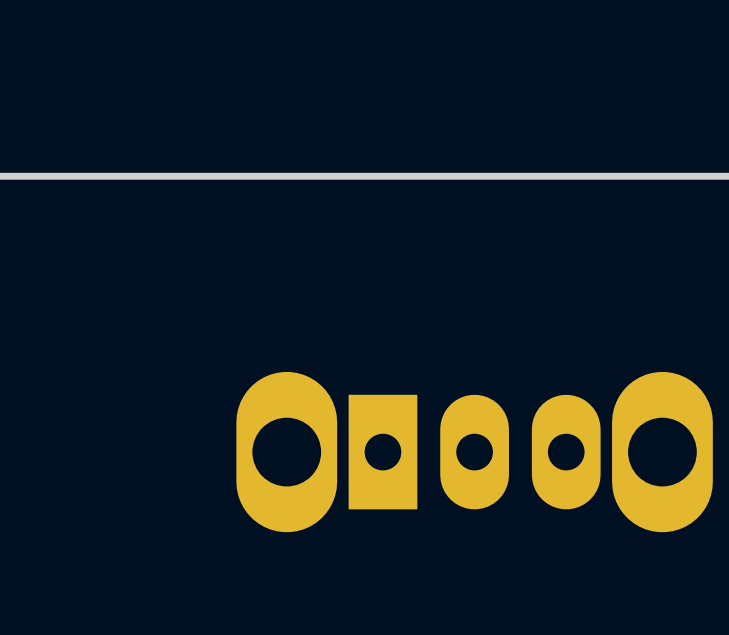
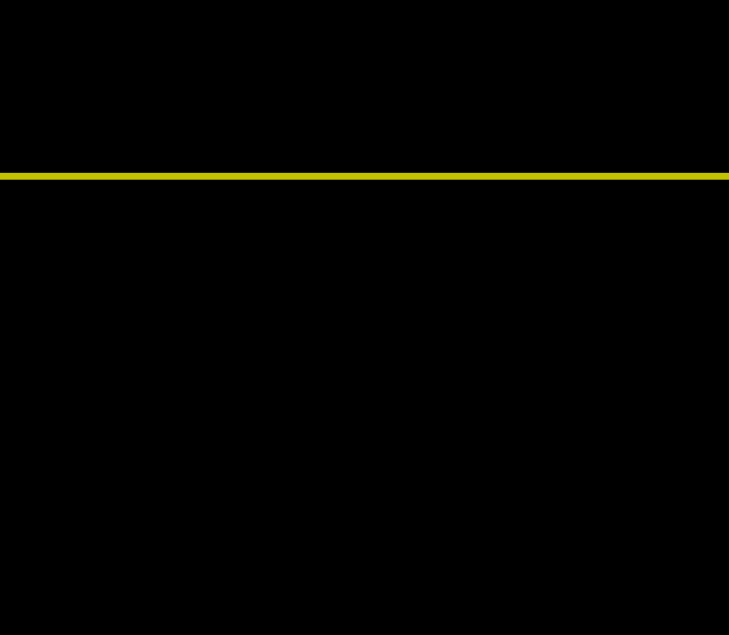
part: (474, 452) -> none

